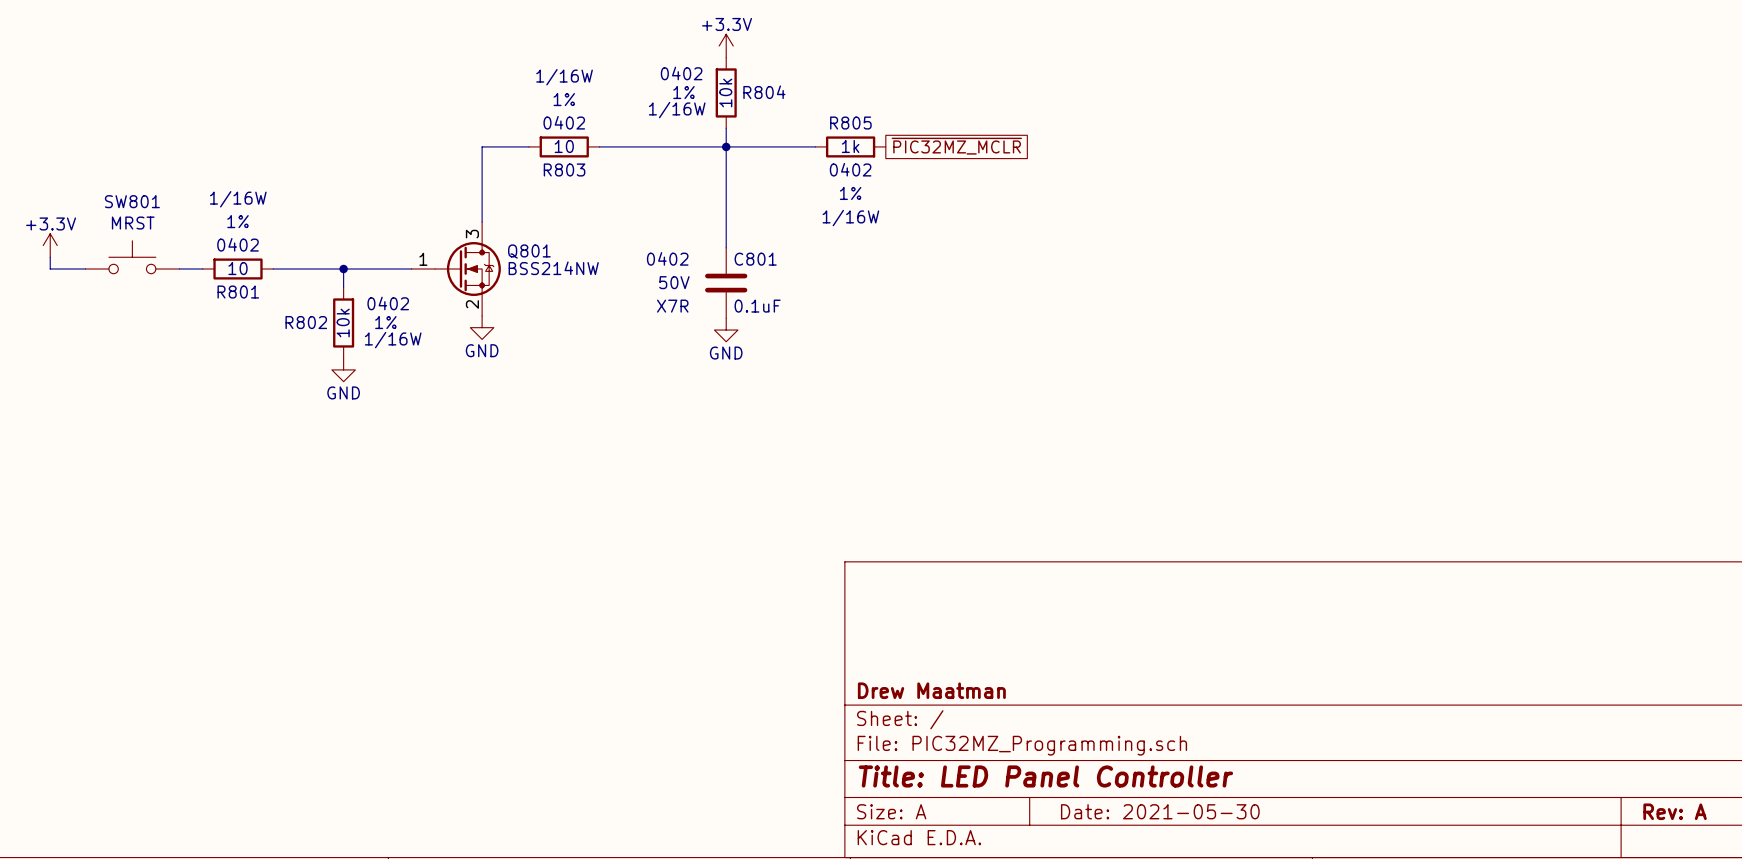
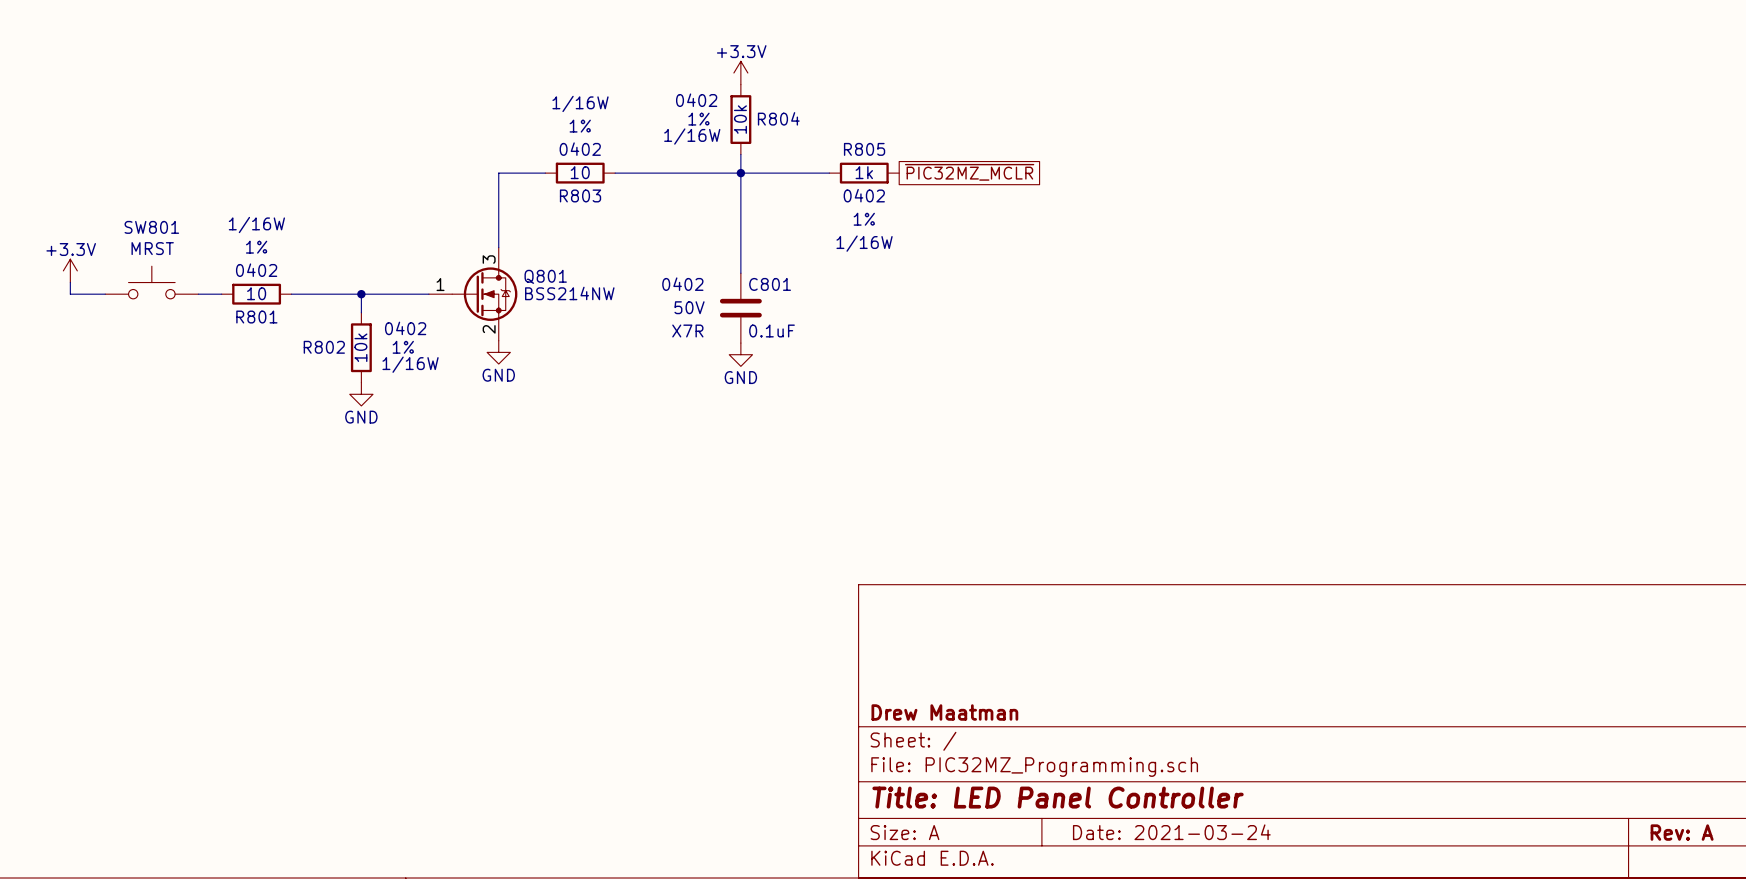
title block: Date: 2021-05-30 (1160, 811) -> Date: 2021-03-24 (1171, 832)

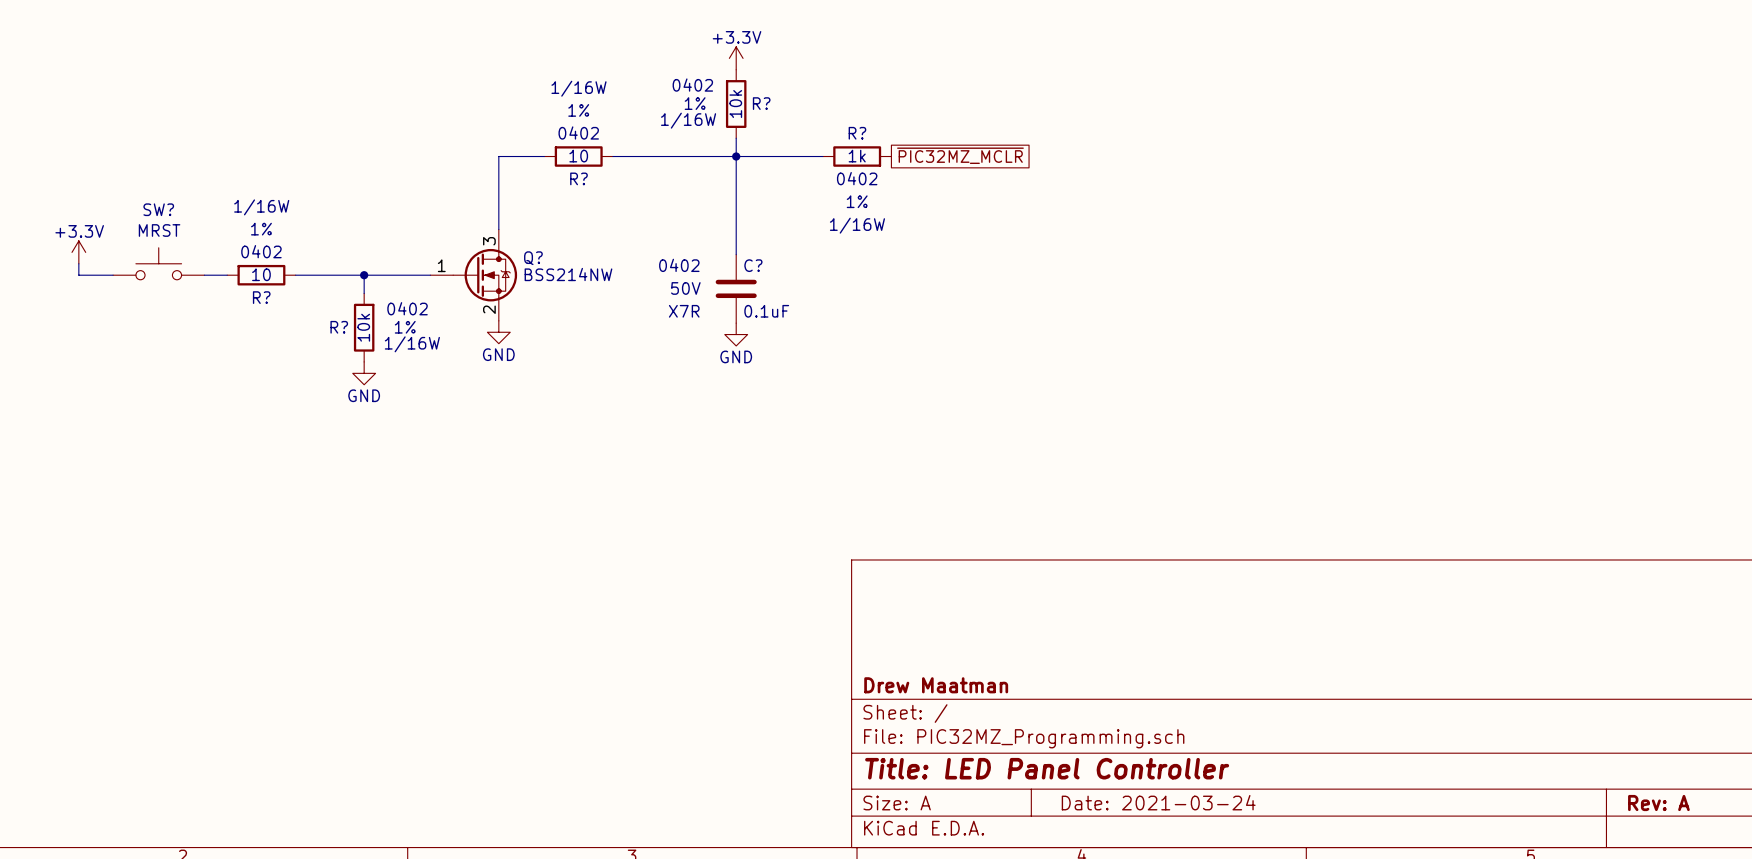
R804 name: R804 (778, 118) -> R? (761, 103)
R805 name: R805 (864, 149) -> R? (857, 133)
R803 name: R803 (580, 195) -> R? (578, 178)
SW801 name: SW801 (151, 227) -> SW? (158, 209)
Q801 name: Q801 (545, 276) -> Q? (533, 258)
C801 name: C801 (770, 284) -> C? (753, 265)
R801 name: R801 (256, 317) -> R? (261, 297)
R802 name: R802 (324, 347) -> R? (339, 327)

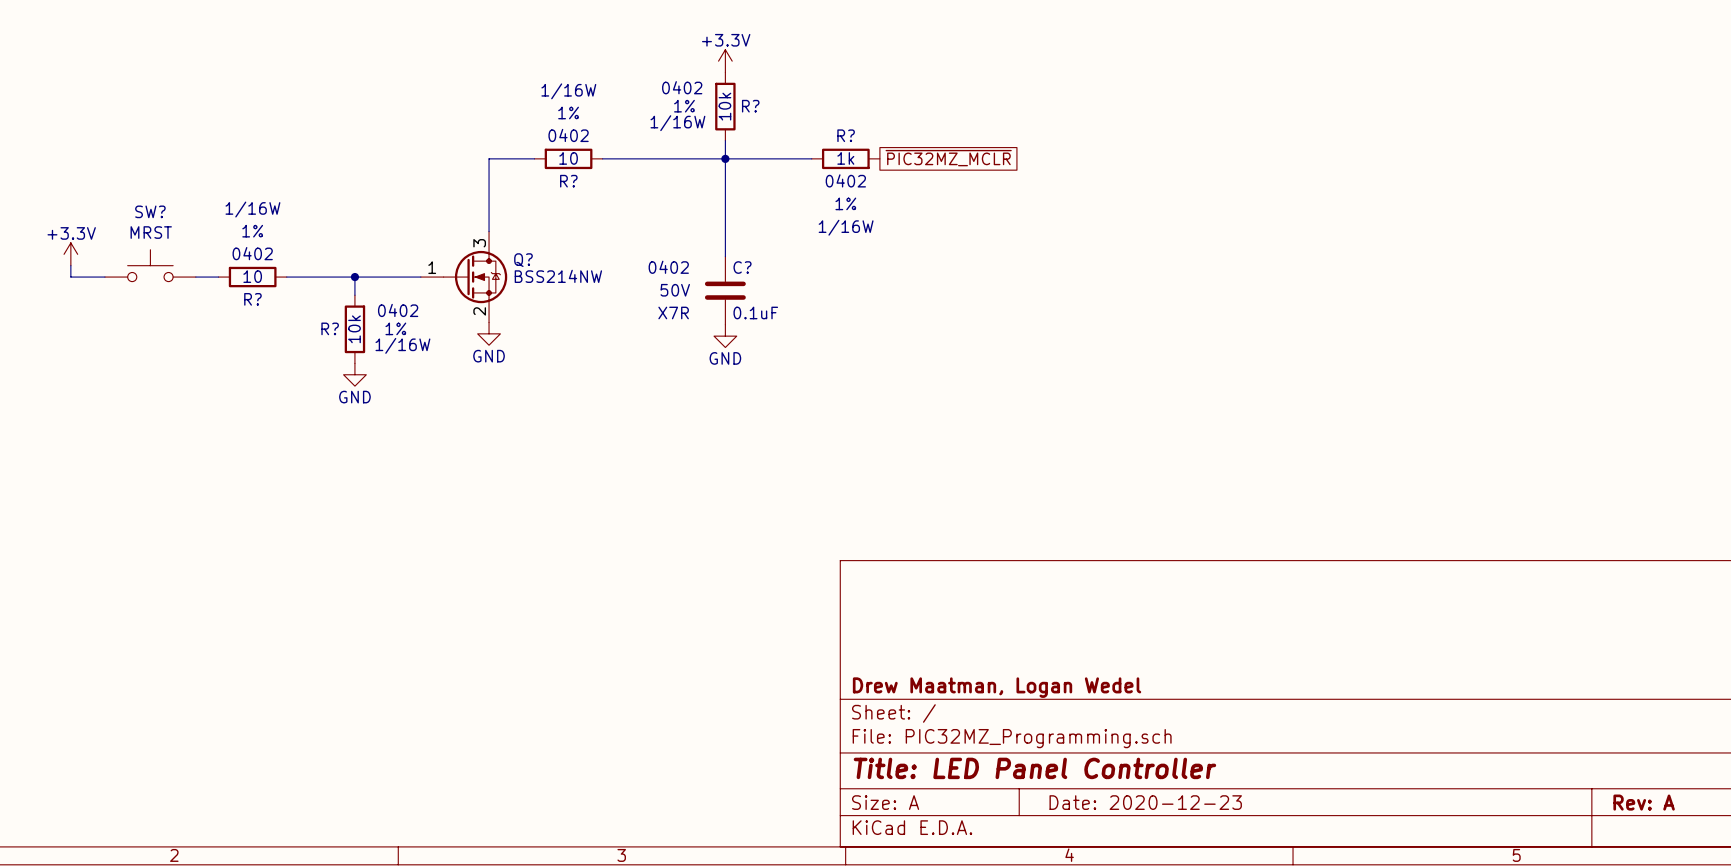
title block: Drew Maatman (936, 685) -> Drew Maatman, Logan Wedel (997, 687)
title block: Date: 2021-03-24 (1158, 802) -> Date: 2020-12-23 (1145, 802)

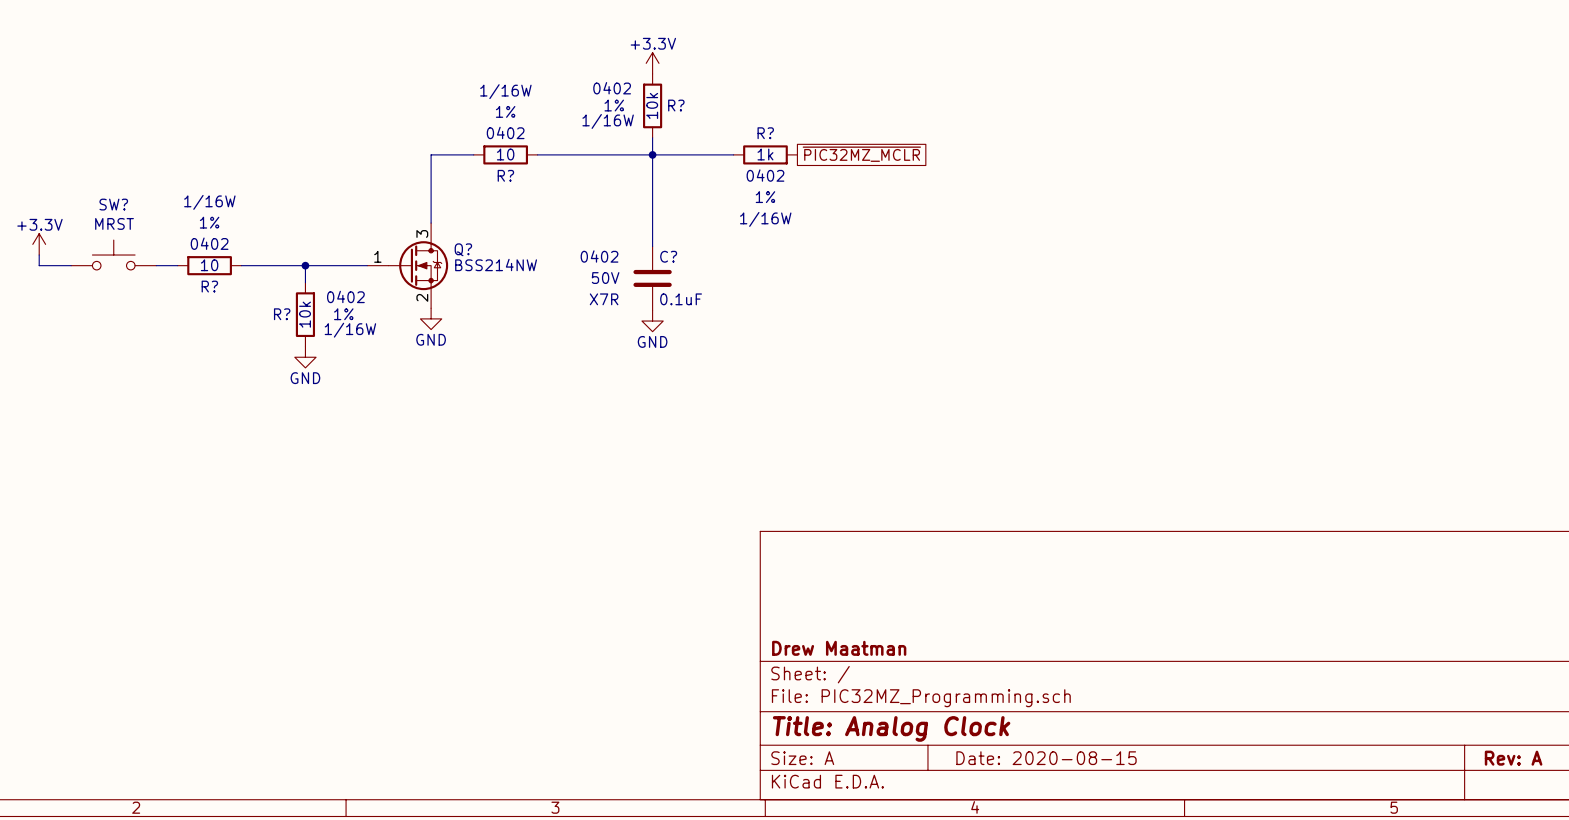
title block: Drew Maatman, Logan Wedel (997, 687) -> Drew Maatman (839, 648)
title block: Title: LED Panel Controller (1034, 768) -> Title: Analog Clock (891, 728)
title block: Date: 2020-12-23 (1145, 802) -> Date: 2020-08-15 (1046, 758)

